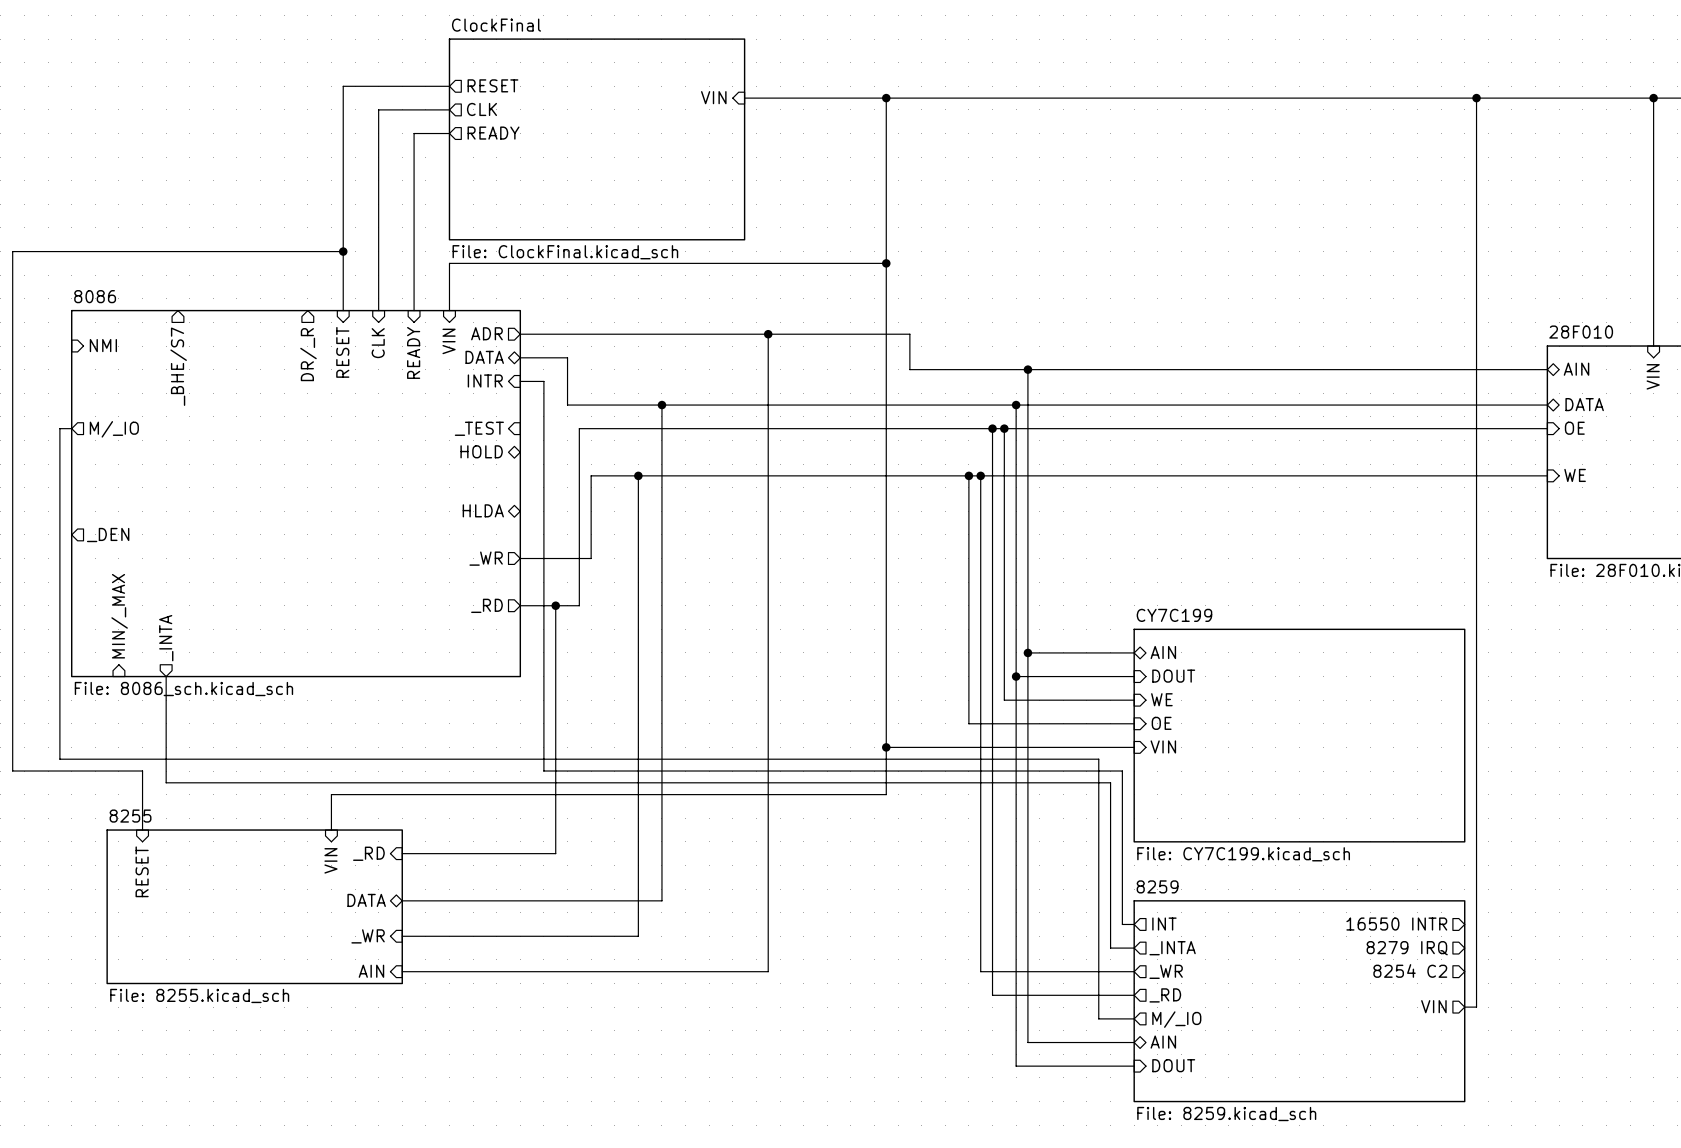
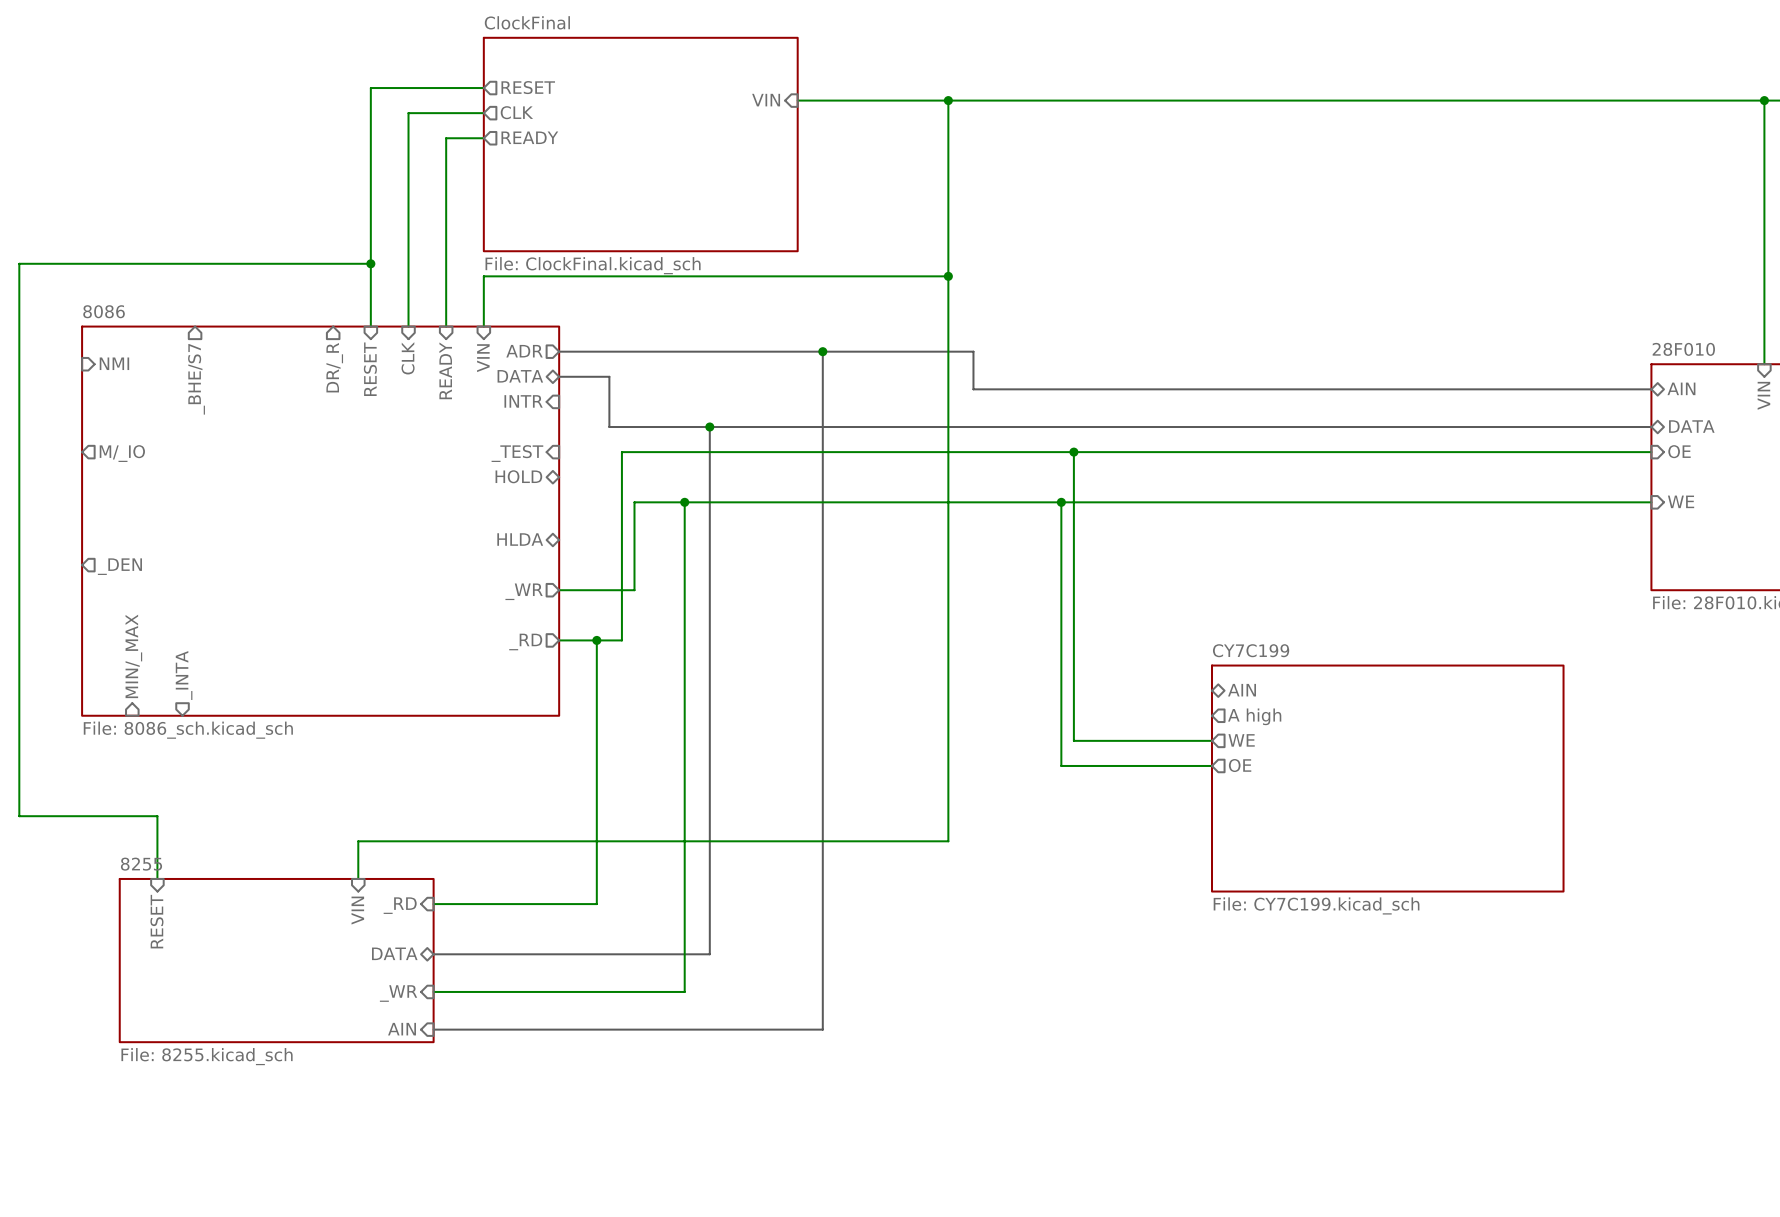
wire: (1476, 98) (1476, 1007) (1464, 1007) -> none
junction: (1476, 98) -> none
bus: (1027, 369) (1027, 1042) (1134, 1042) -> none
junction: (1027, 369) -> none
wire: (520, 381) (543, 381) (543, 771) (1122, 771) (1122, 924) (1134, 924) -> none
bus: (1016, 405) (1016, 1066) (1134, 1066) -> none
junction: (1016, 405) -> none
wire: (71, 428) (59, 428) (59, 759) (1098, 759) (1098, 1018) (1134, 1018) -> none
wire: (992, 428) (992, 475) -> none
junction: (992, 428) -> none
wire: (968, 475) (968, 723) (992, 723) (992, 995) (1134, 995) -> none
junction: (968, 475) -> none
wire: (980, 475) (980, 971) (1134, 971) -> none
junction: (980, 475) -> none
junction: none -> (1061, 502)
bus: (1027, 652) (1134, 652) -> none
junction: (1027, 652) -> none
wire: (166, 676) (166, 782) (1110, 782) (1110, 948) (1134, 948) -> none
bus: (1016, 676) (1134, 676) -> none
junction: (1016, 676) -> none
sheet pin shape: input (1173, 676) -> output (1254, 716)
sheet pin: DOUT (1173, 676) -> A high (1254, 716)
sheet pin shape: input (1161, 699) -> output (1241, 740)
sheet pin shape: input (1161, 723) -> output (1240, 765)
sheet pin: VIN (1163, 746) -> none
wire: (886, 747) (1134, 747) -> none
junction: (886, 747) -> none
sheet pin: INT (1164, 924) -> none
sheet pin: 16550 INTR (1396, 924) -> none
sheet pin: _INTA (1172, 948) -> none
sheet pin: 8279 IRQ (1407, 948) -> none
sheet pin: 8254 C2 (1410, 970) -> none
sheet pin: _WR (1166, 971) -> none
sheet pin: _RD (1165, 995) -> none
sheet 8259: File: 8259.kicad_sch (1299, 1001) -> none
sheet pin: VIN (1433, 1006) -> none
sheet pin: M/_IO (1176, 1019) -> none
sheet pin: AIN (1163, 1042) -> none
sheet pin: DOUT (1173, 1065) -> none

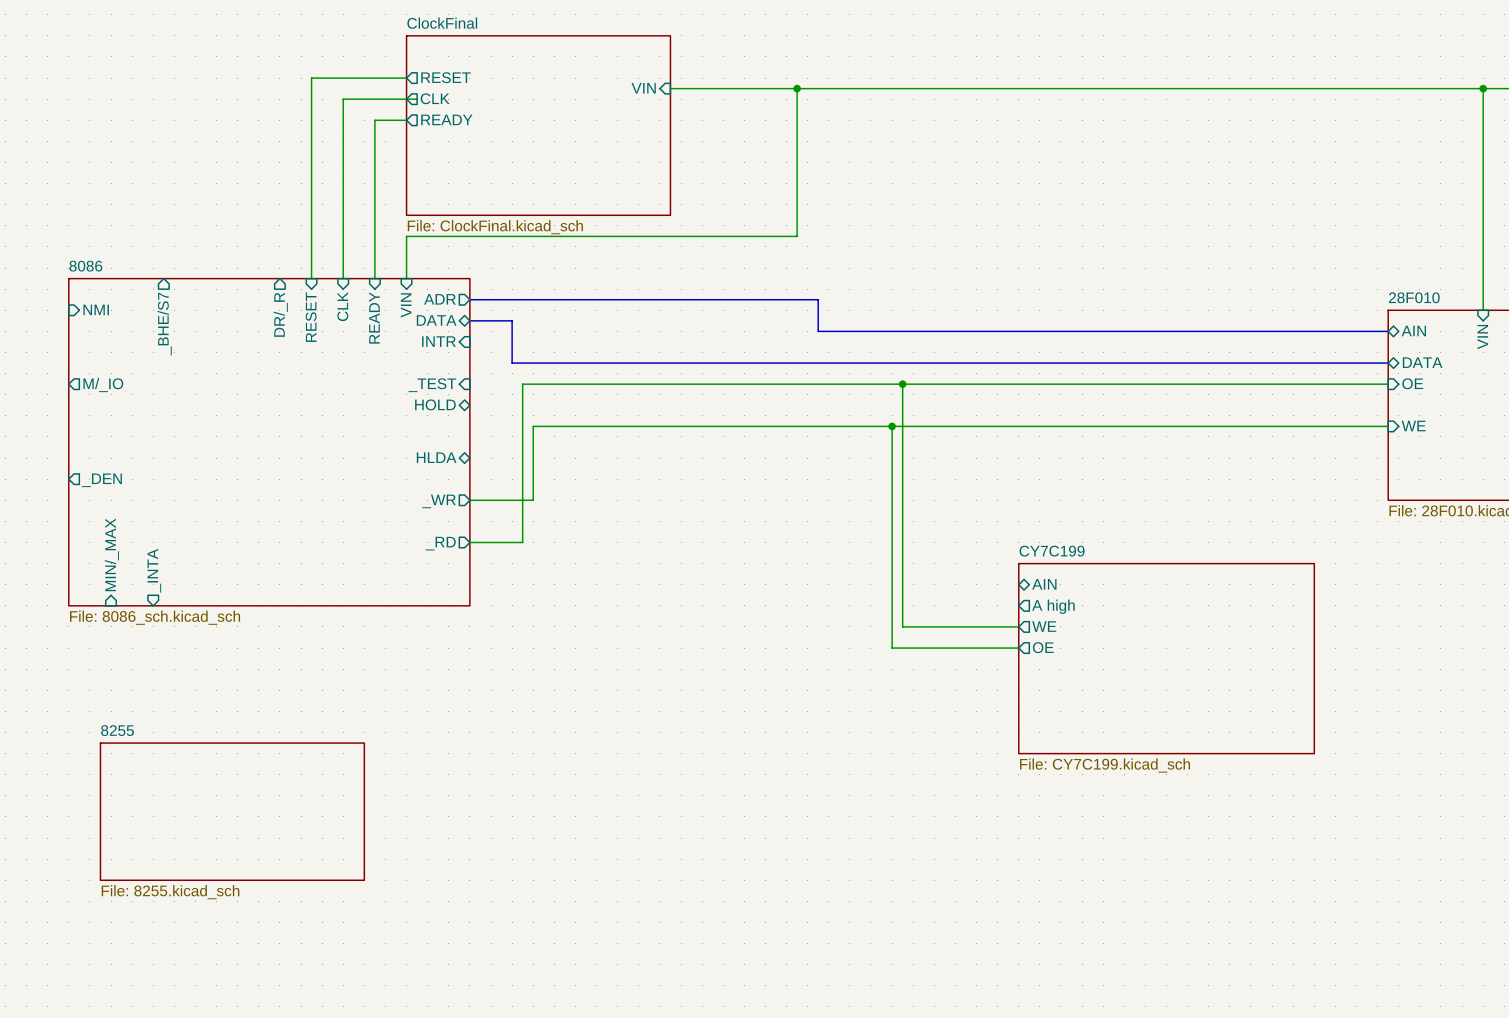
wire: none -> (406, 99) (417, 99)
wire: (370, 263) (19, 263) (19, 816) (157, 816) (157, 878) -> none
junction: (370, 263) -> none
wire: (948, 276) (948, 841) (358, 841) (358, 878) -> none
junction: (948, 276) -> none
bus: (822, 351) (822, 1029) (433, 1029) -> none
junction: (822, 351) -> none
bus: (709, 427) (709, 954) (433, 954) -> none
junction: (709, 427) -> none
wire: (684, 502) (684, 991) (433, 991) -> none
junction: (684, 502) -> none
wire: (596, 640) (596, 904) (433, 904) -> none
junction: (596, 640) -> none
sheet pin: _RD (400, 905) -> none
sheet pin: VIN (357, 910) -> none
sheet pin: RESET (156, 921) -> none
sheet pin: DATA (394, 953) -> none
sheet pin: _WR (398, 993) -> none
sheet pin: AIN (402, 1029) -> none

